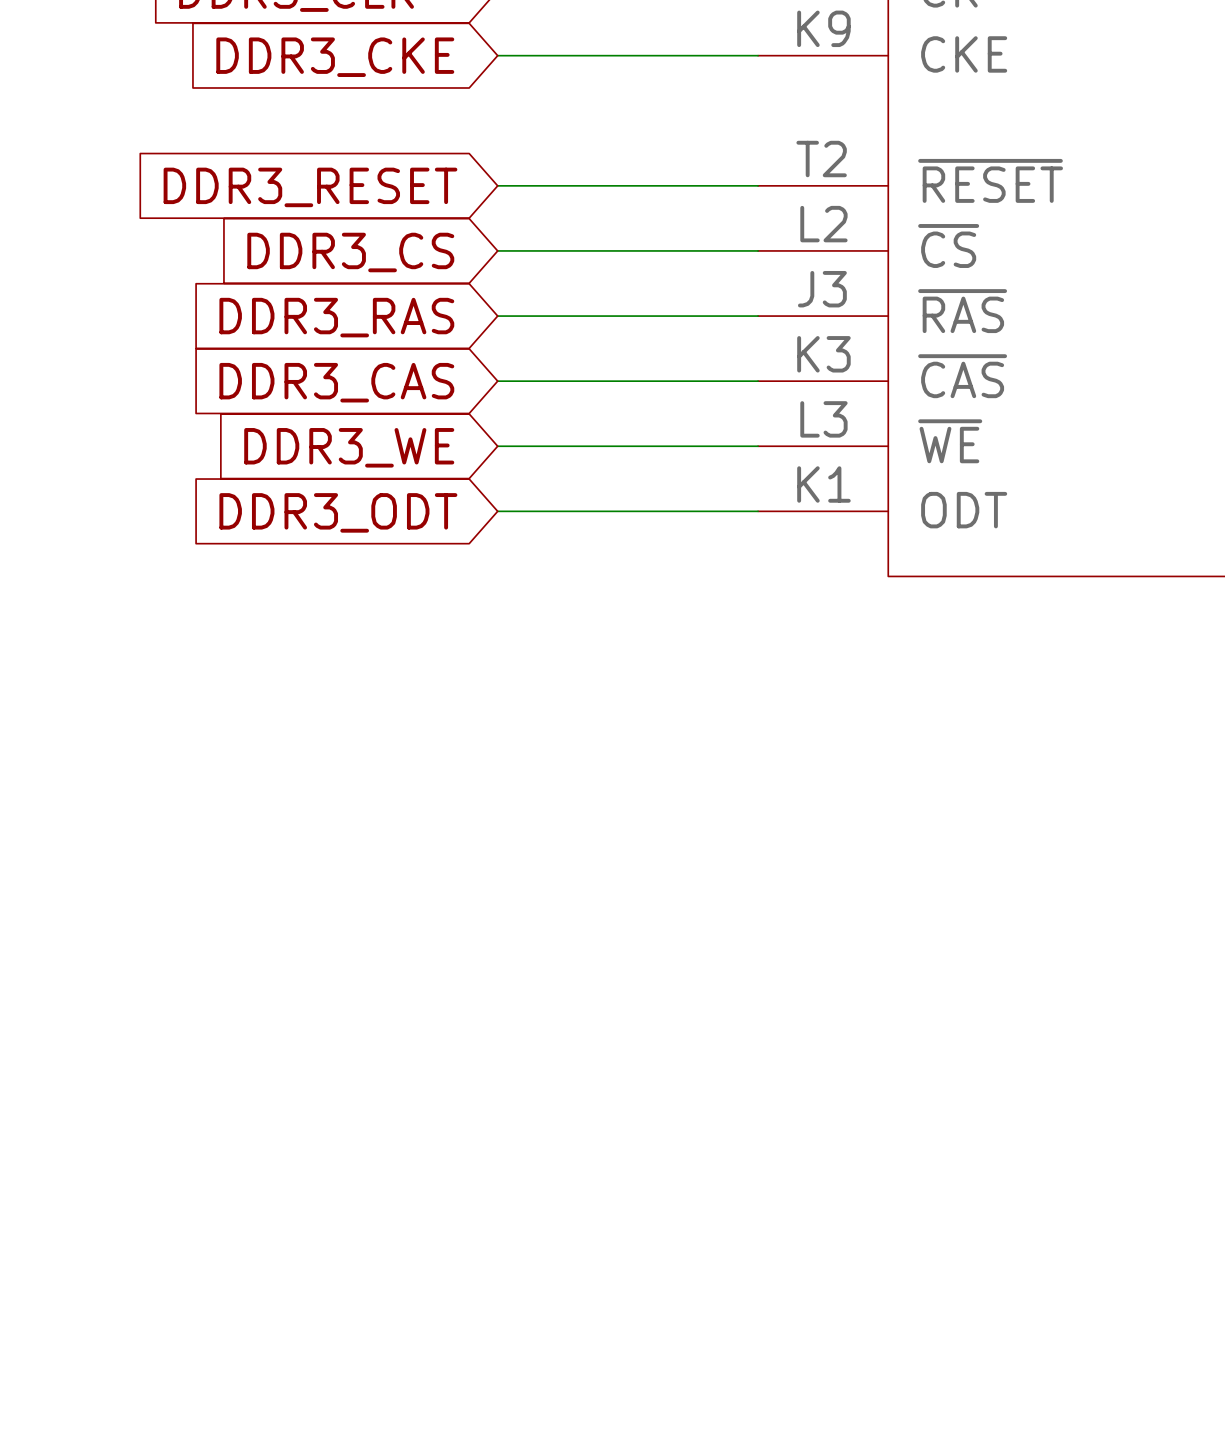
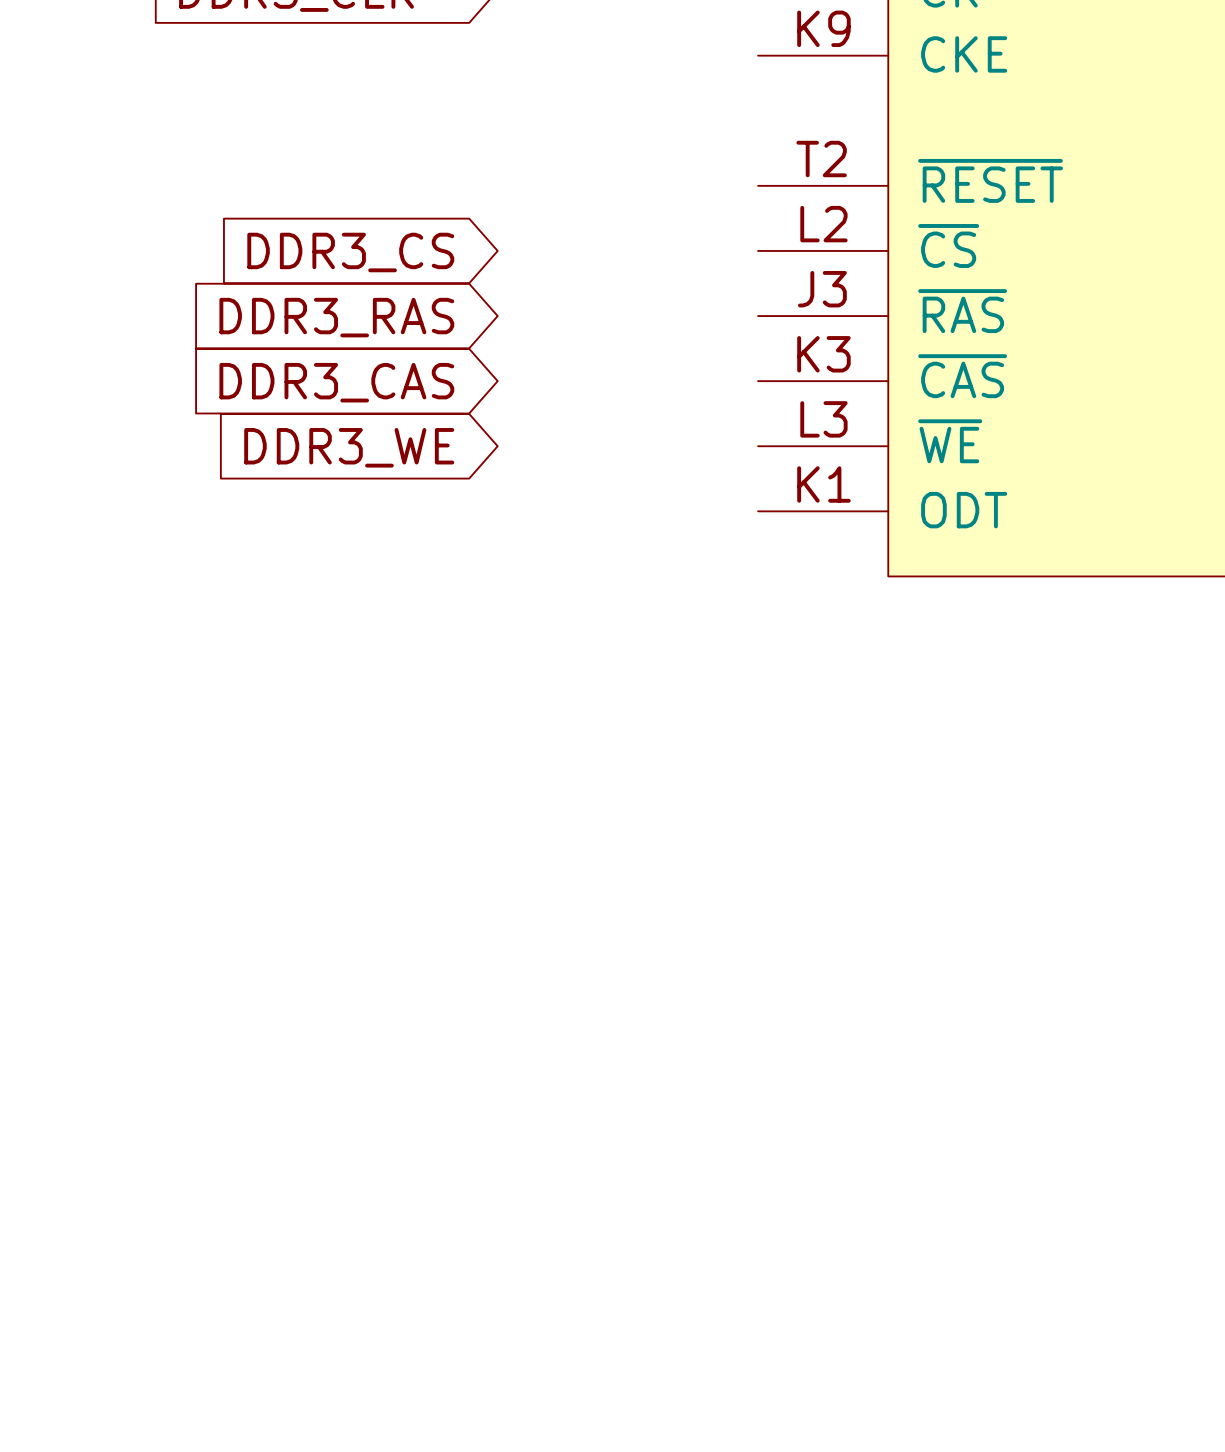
wire: (497, 55) (758, 55) -> none
global label: DDR3_CKE (335, 57) -> none
wire: (497, 185) (758, 185) -> none
global label: DDR3_RESET (310, 187) -> none
wire: (497, 250) (758, 250) -> none
wire: (497, 316) (758, 316) -> none
wire: (497, 381) (758, 381) -> none
wire: (497, 446) (758, 446) -> none
wire: (497, 511) (758, 511) -> none
global label: DDR3_ODT (338, 512) -> none

